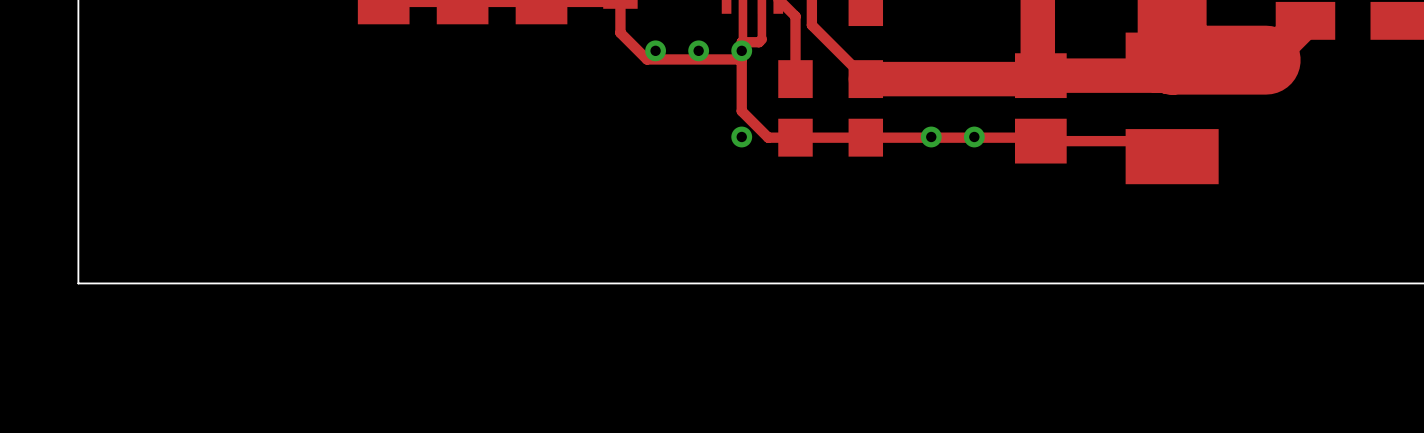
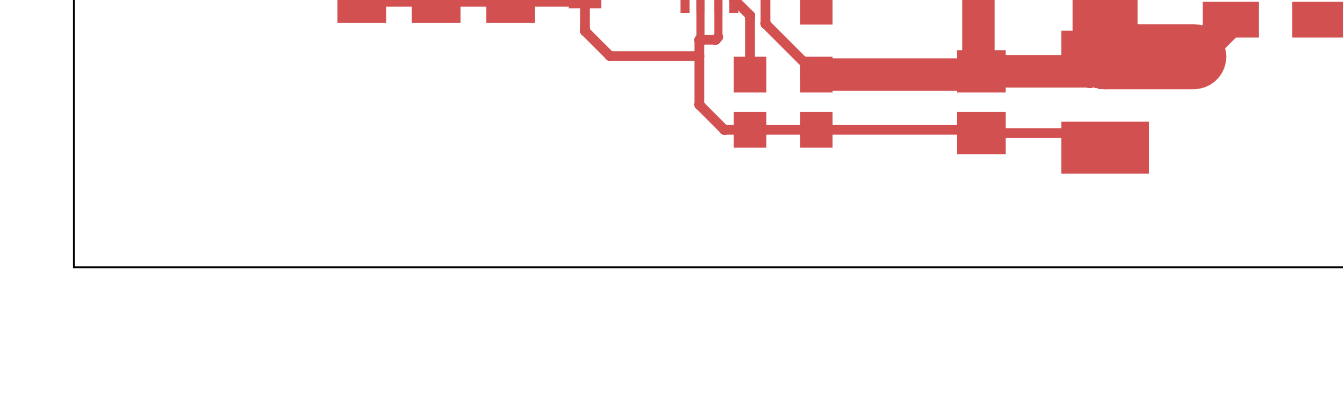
via: (655, 50) -> none
via: (698, 50) -> none
via: (741, 50) -> none
via: (741, 136) -> none
via: (931, 136) -> none
via: (974, 136) -> none

